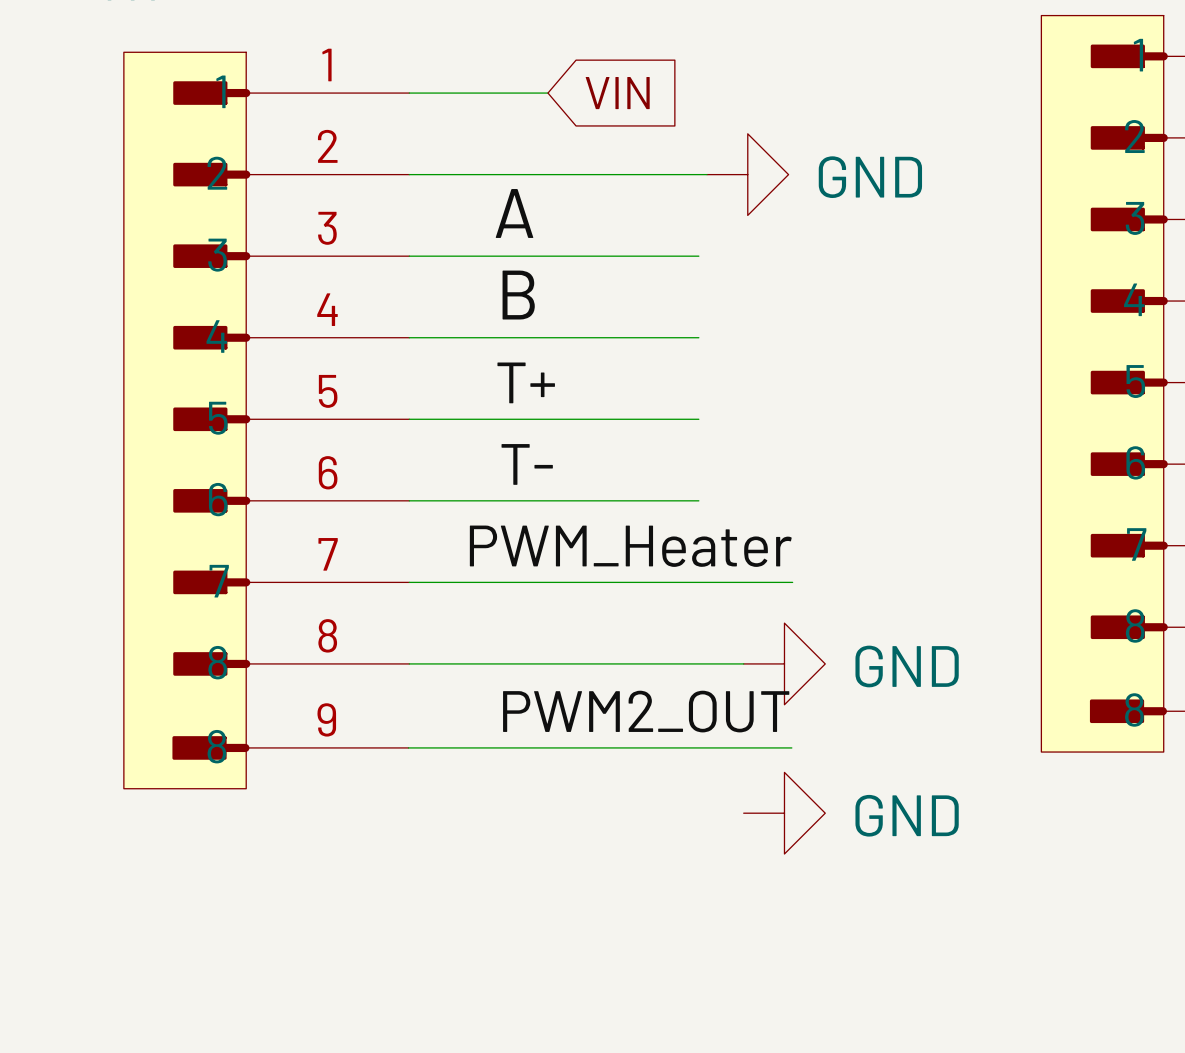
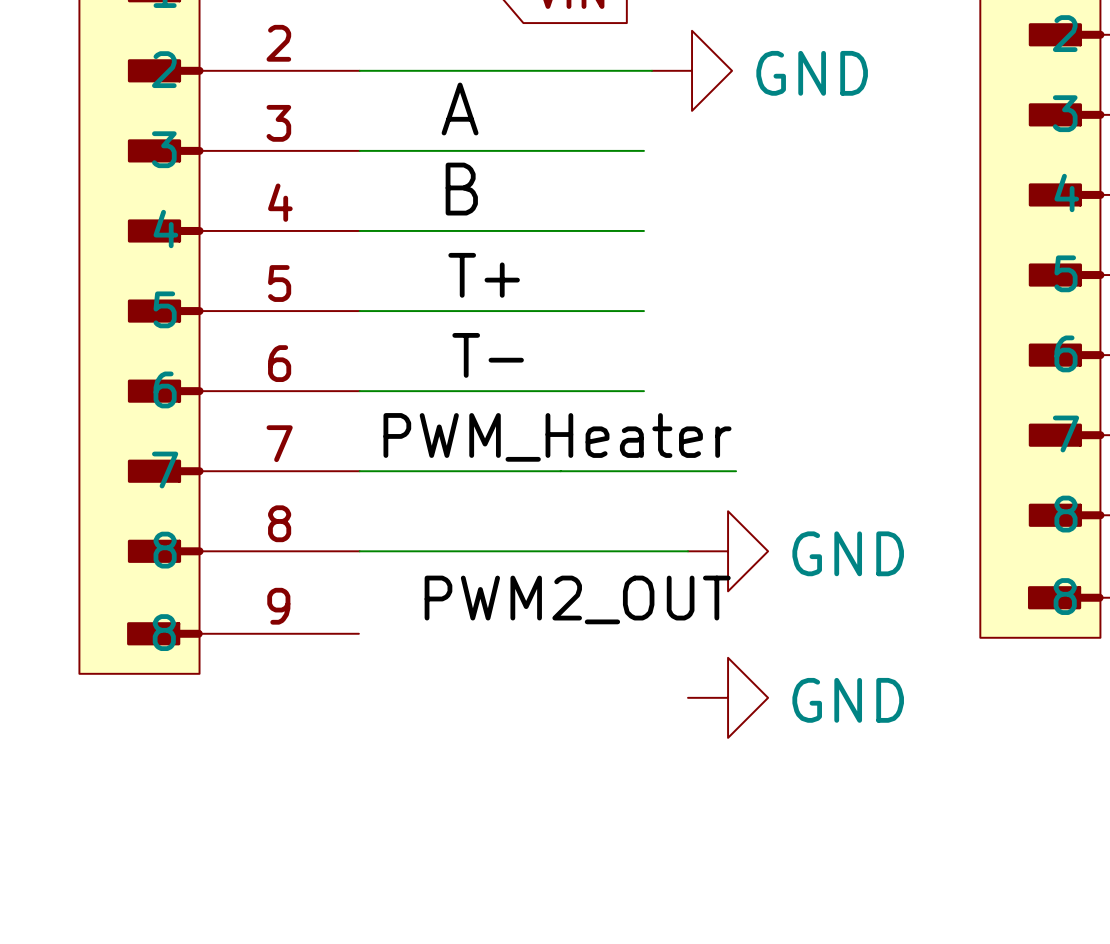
wire: (408, 747) (791, 747) -> none

